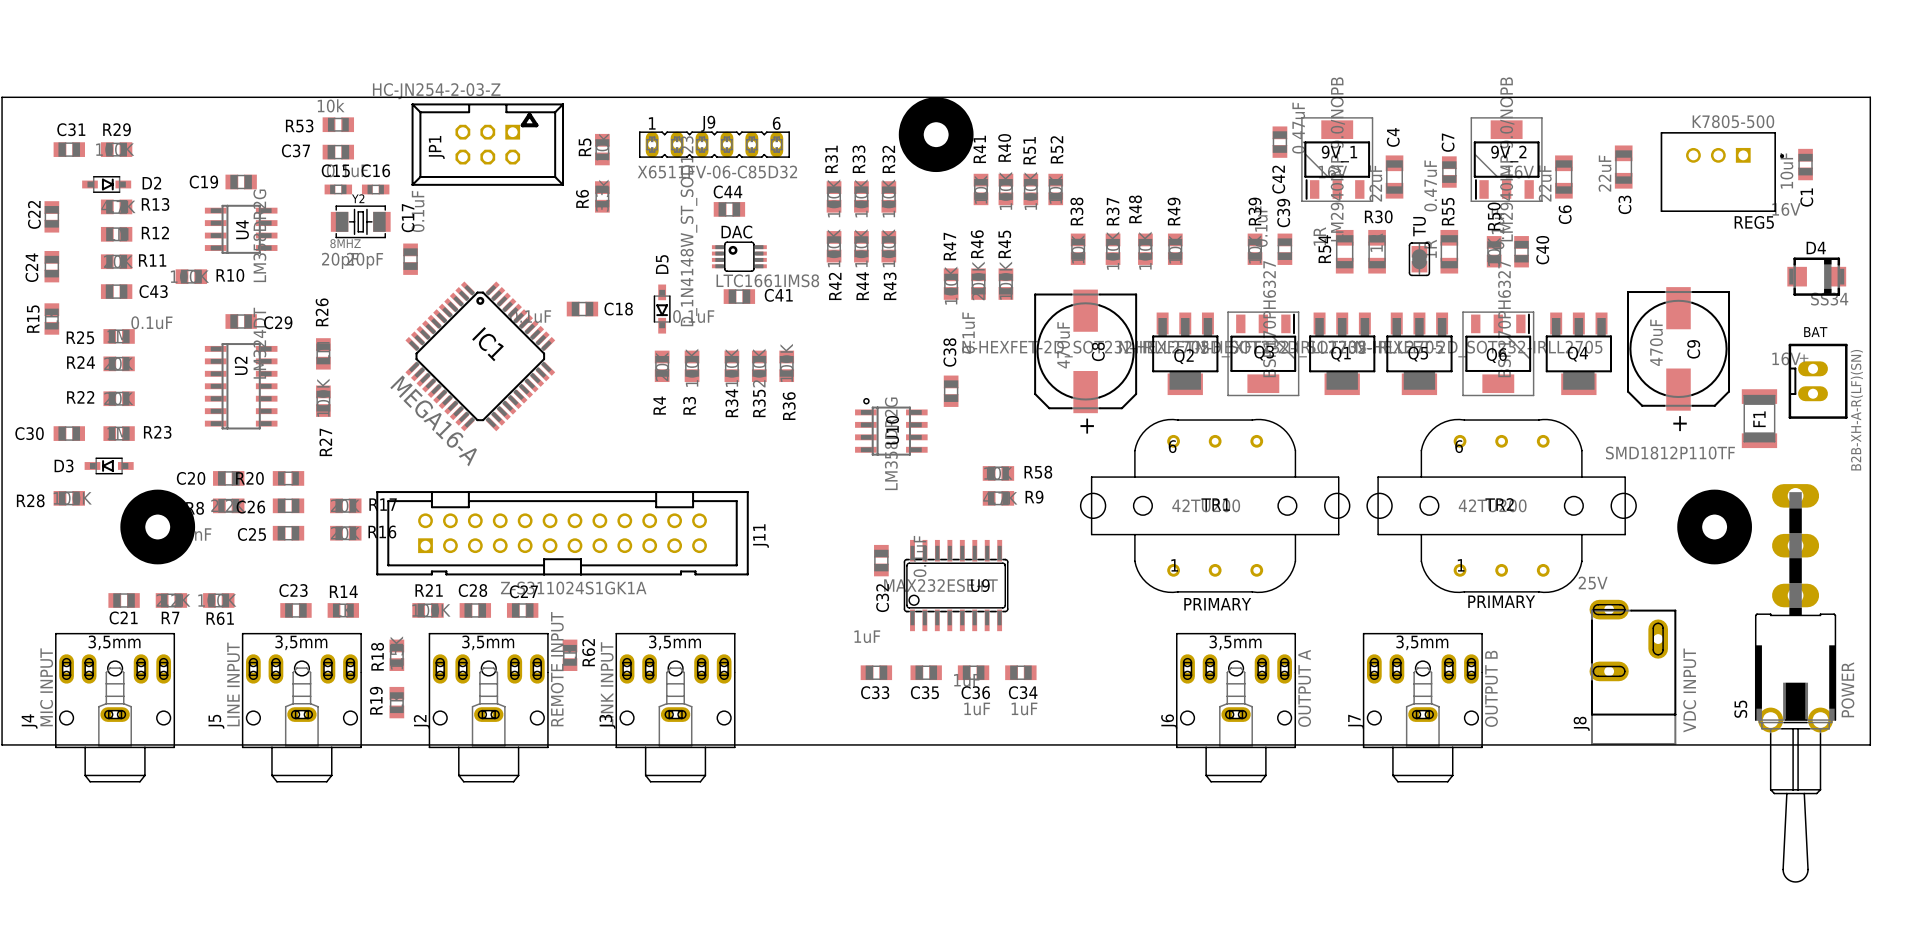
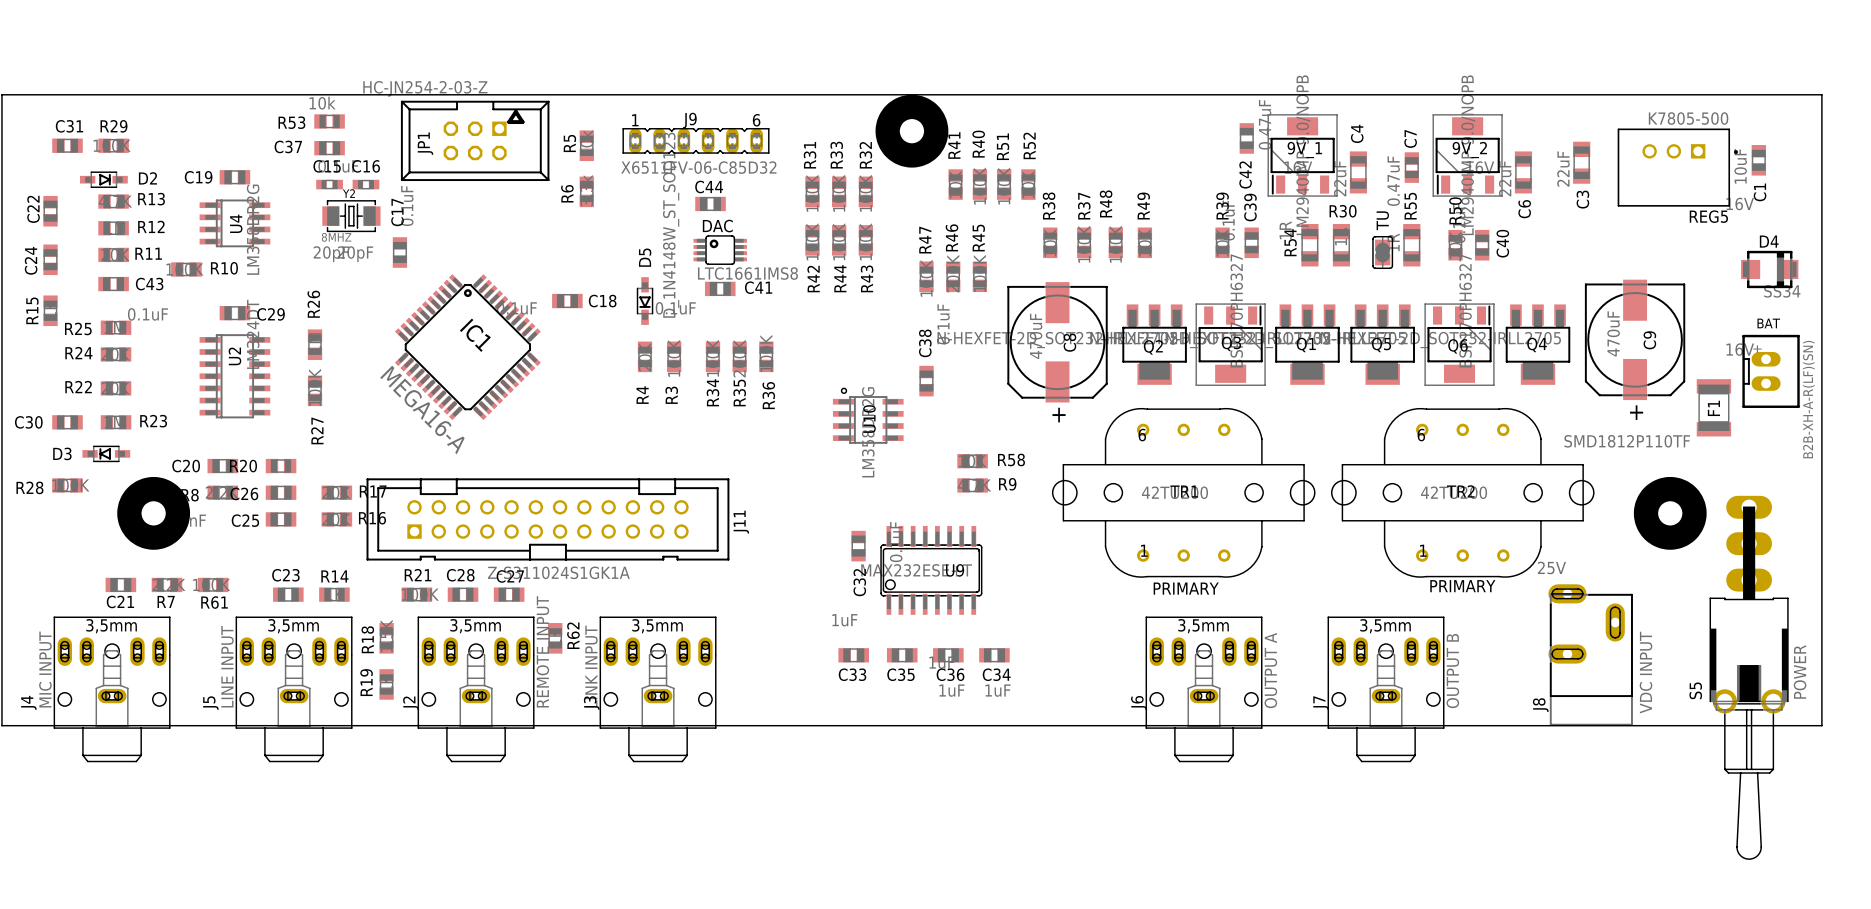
S5 footprint: [1754, 484, 1837, 883] -> [1709, 495, 1789, 860]

